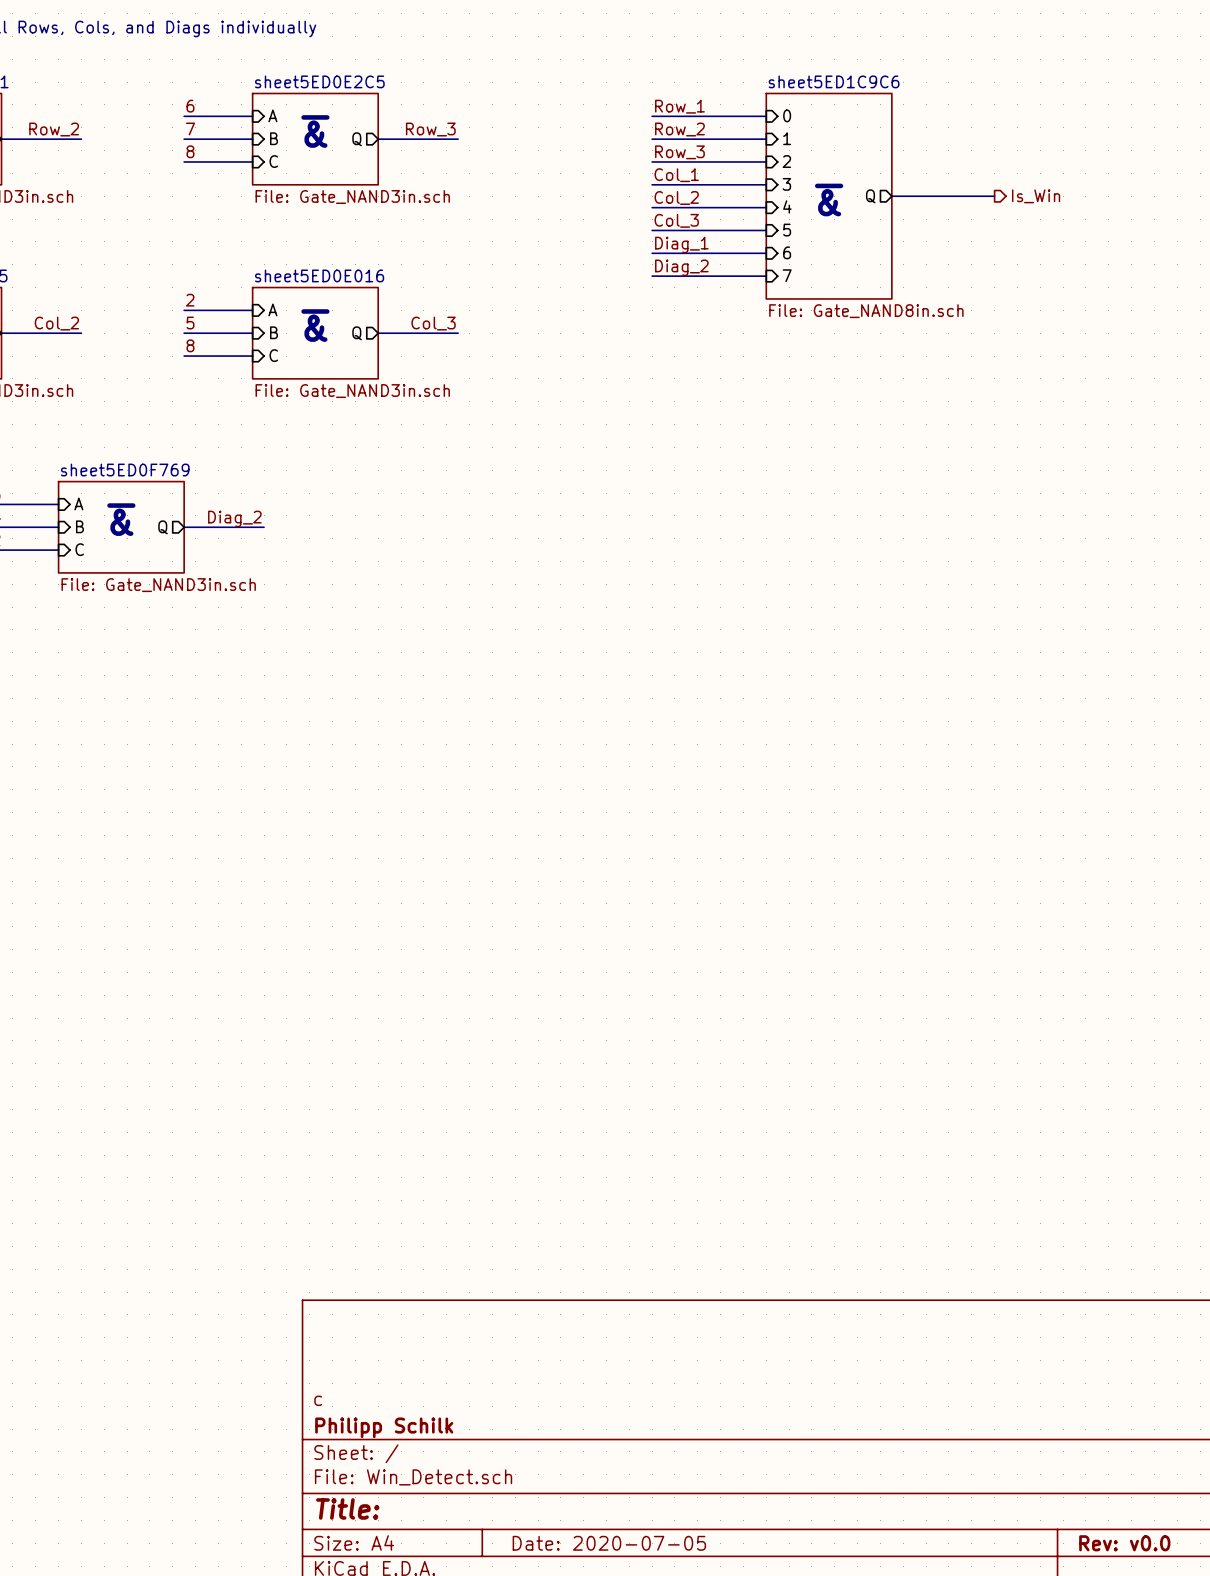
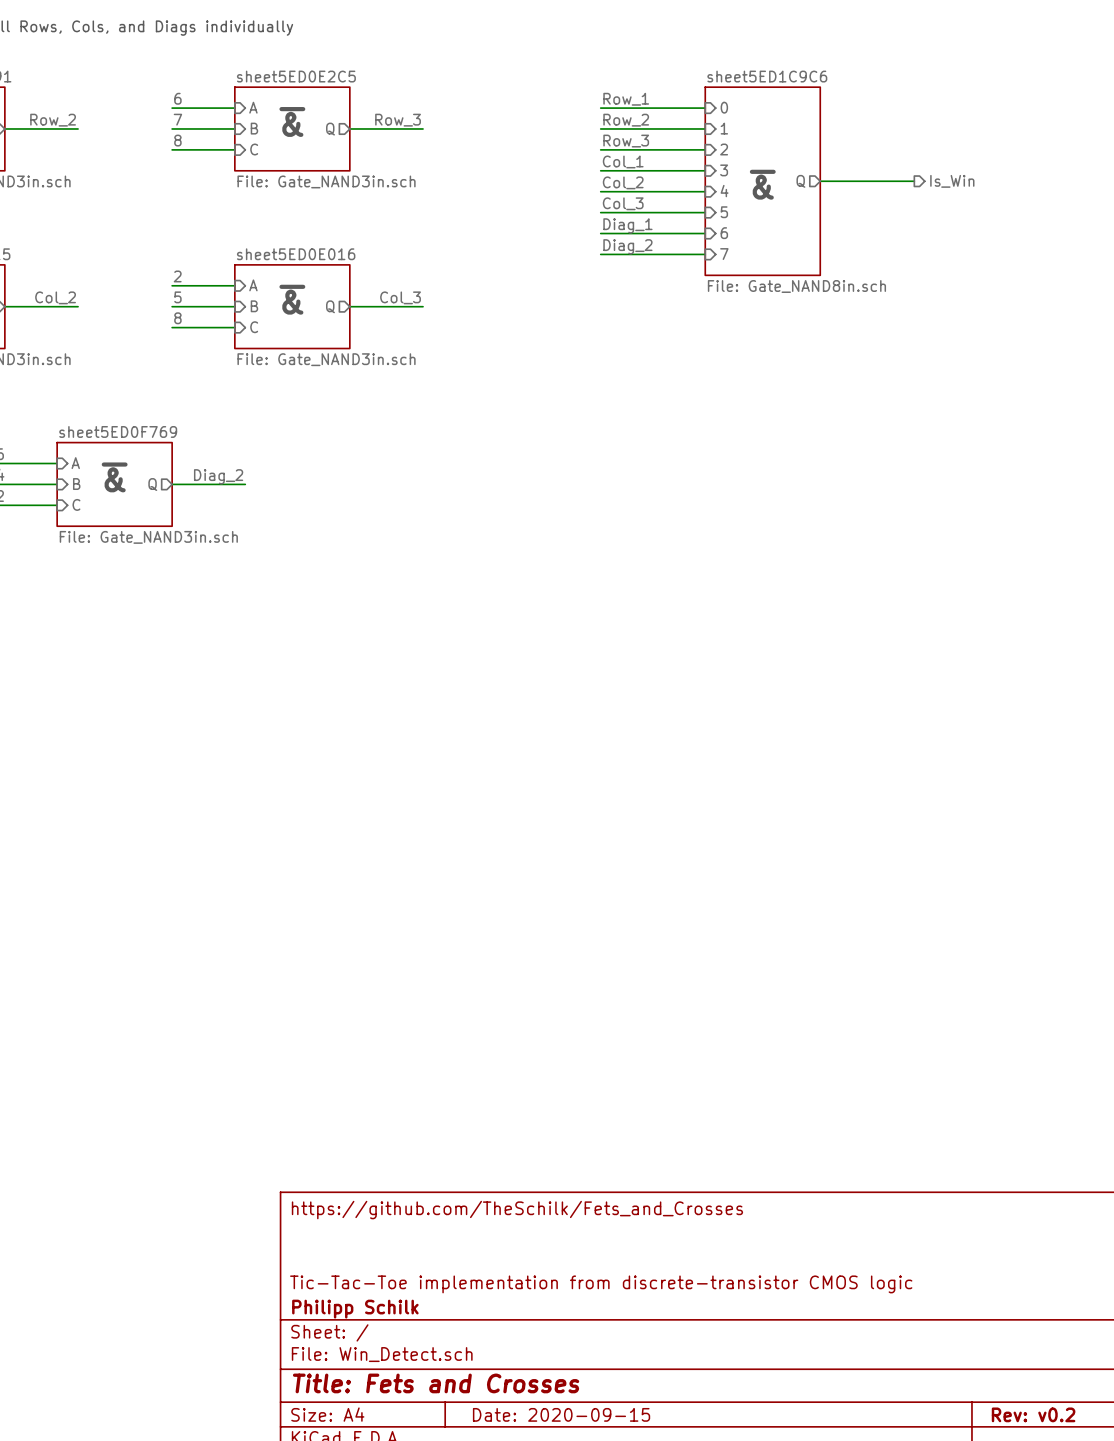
title block: none -> https://github.com/TheSchilk/Fets_and_Crosses (517, 1210)
title block: c (318, 1400) -> Tic-Tac-Toe implementation from discrete-transistor CMOS logic (601, 1284)
title block: Title: (347, 1508) -> Title: Fets and Crosses (436, 1383)
title block: Date: 2020-07-05 (609, 1543) -> Date: 2020-09-15 (561, 1414)
title block: Rev: v0.0 (1124, 1543) -> Rev: v0.2 (1033, 1414)

